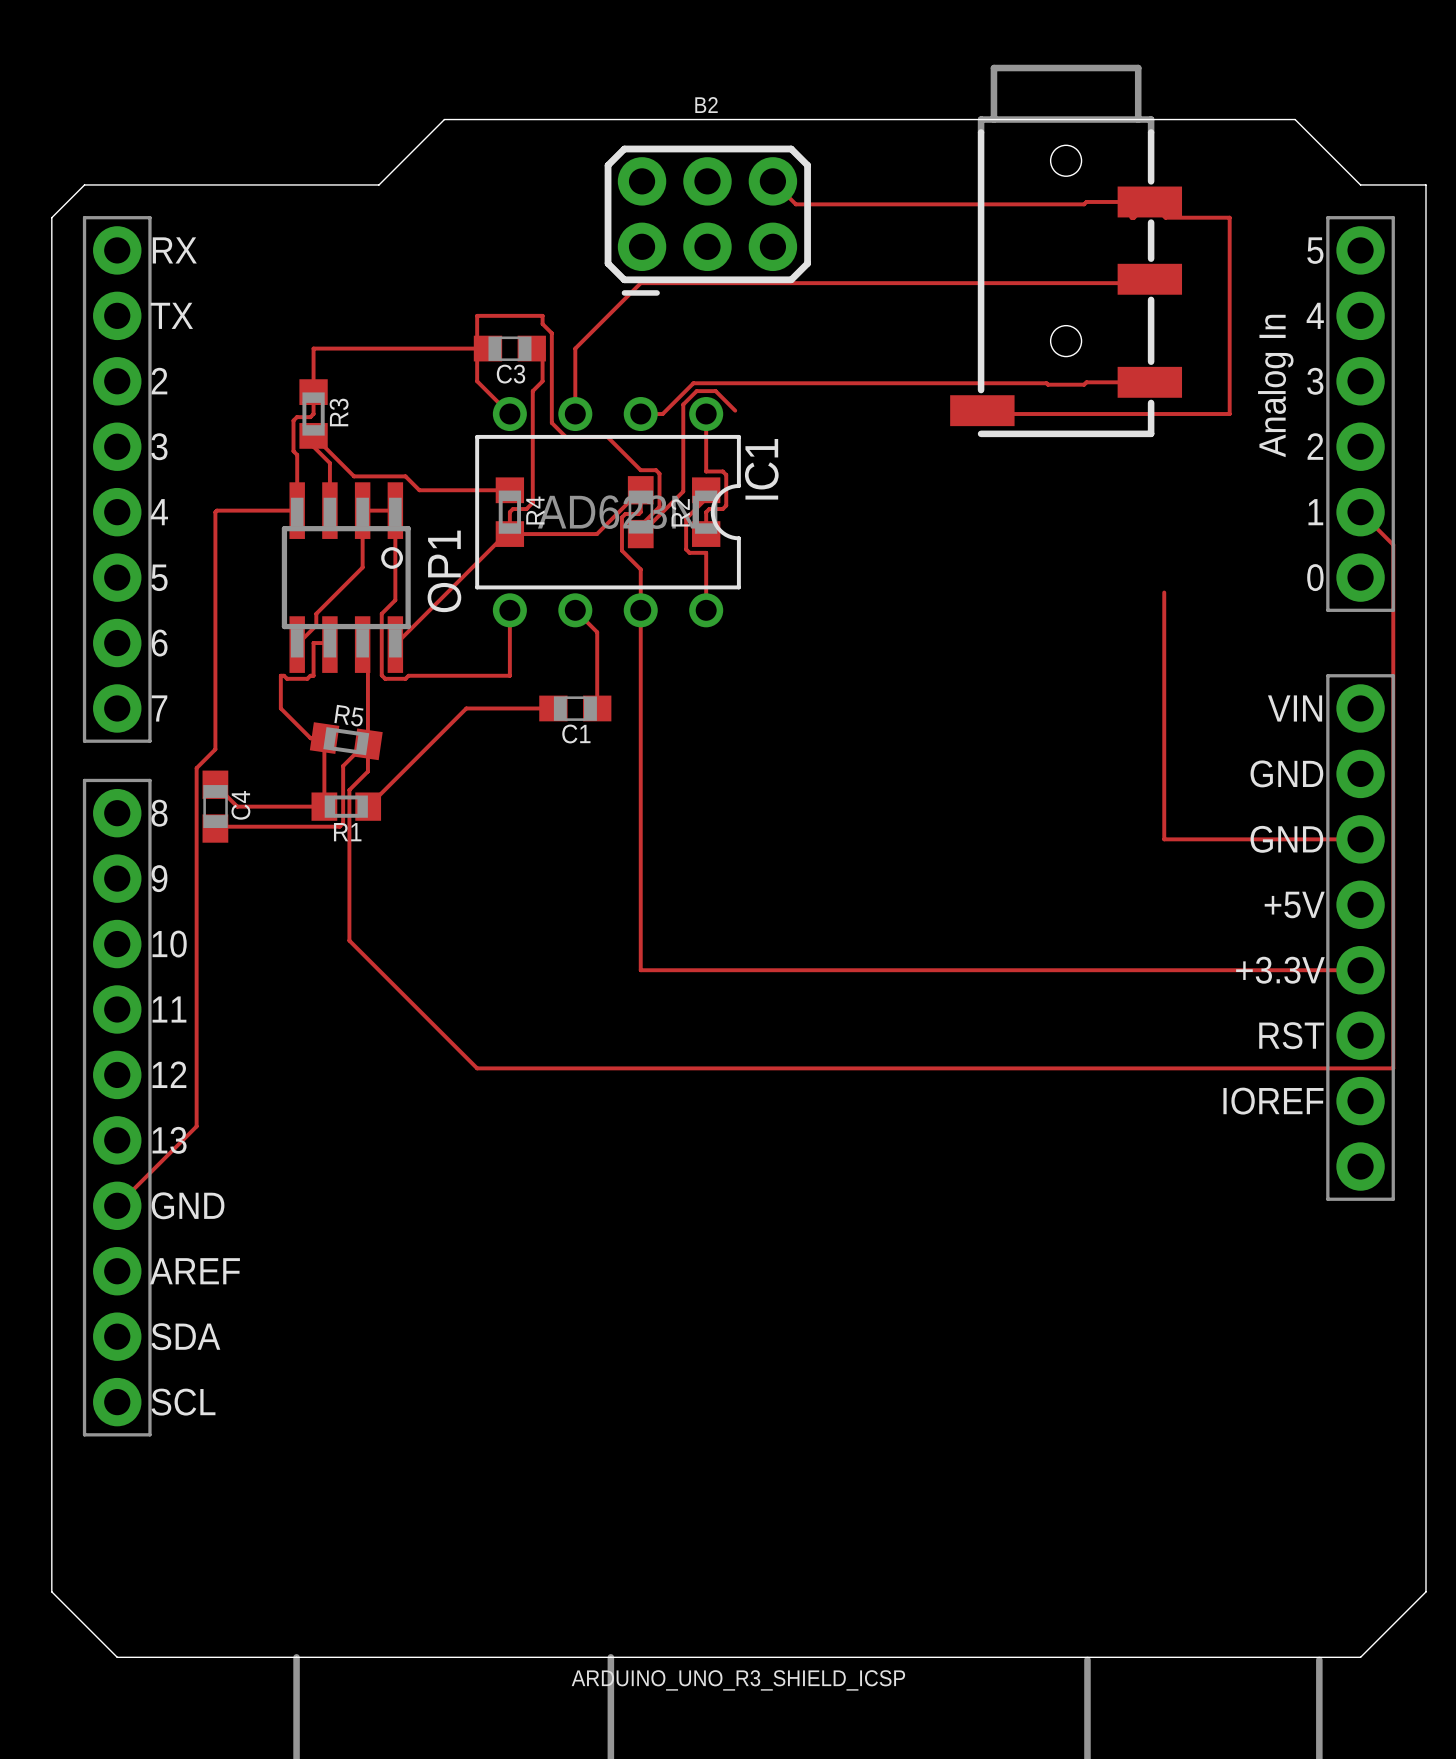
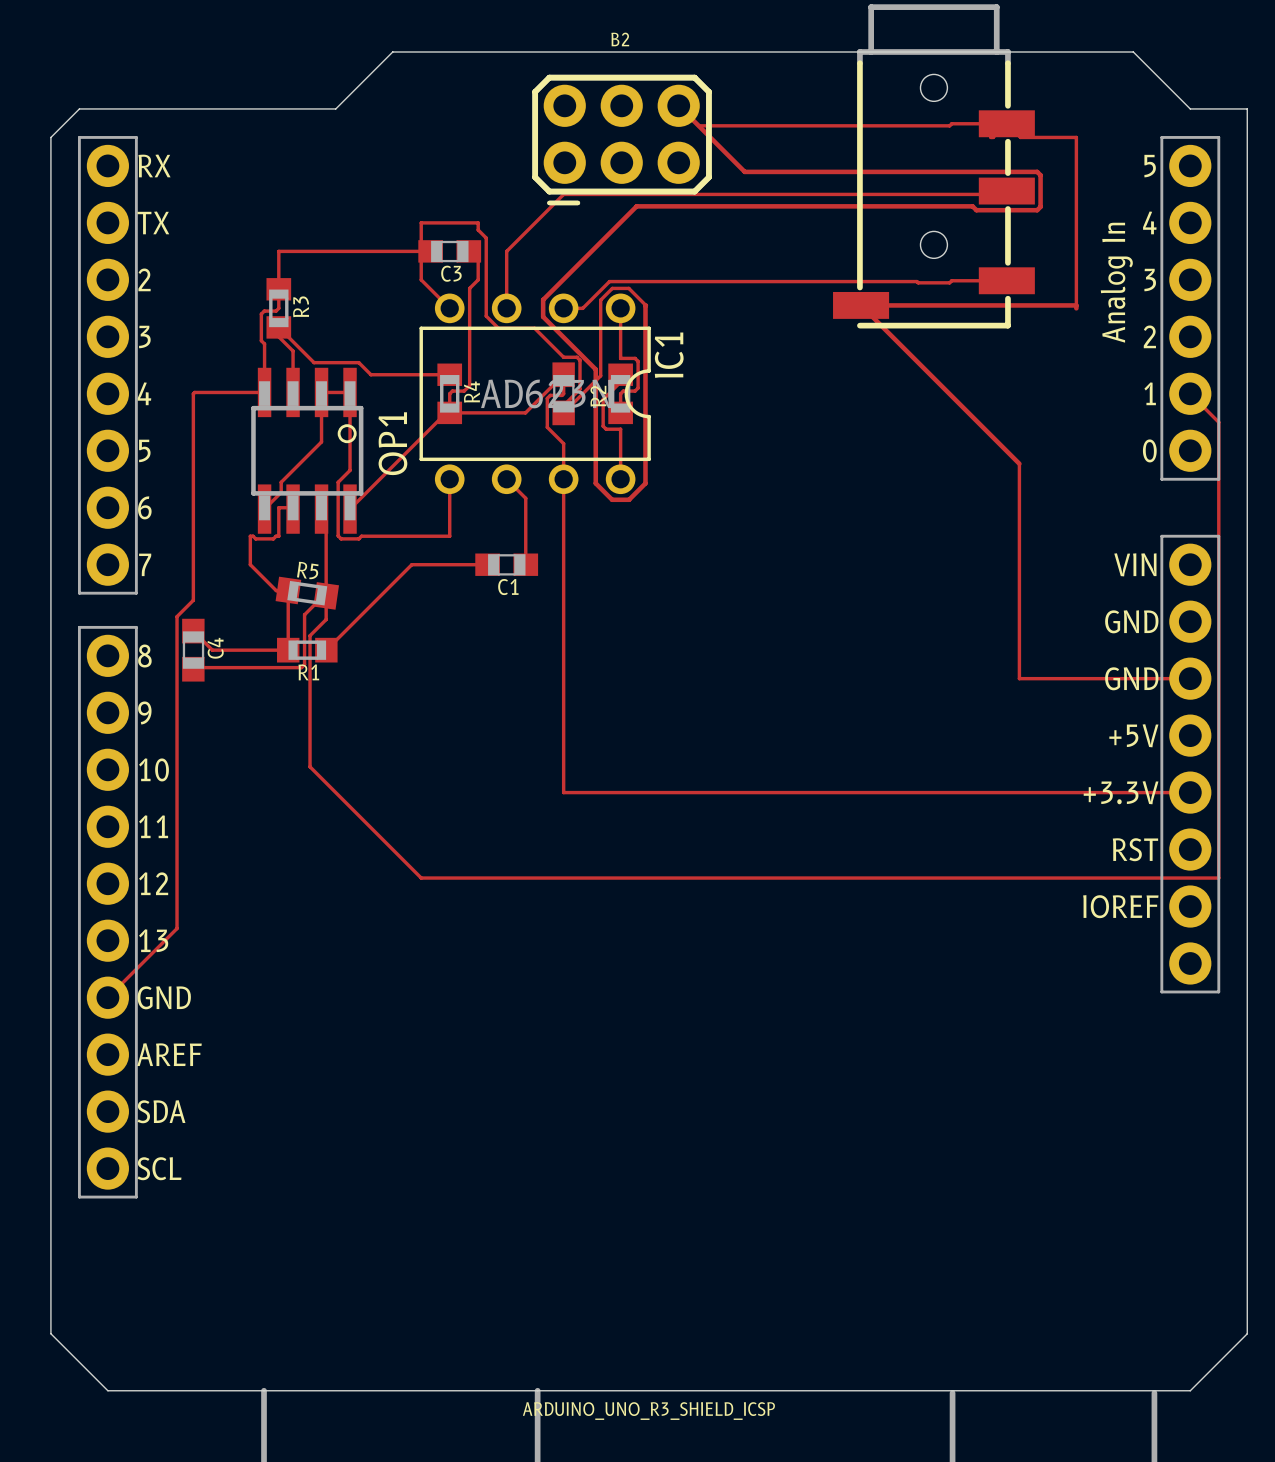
track: none -> (678, 105) (744, 171) (1037, 171) (1040, 175) (1040, 206) (1037, 210) (976, 210) (972, 206) (636, 206) (543, 299) (543, 316) (595, 369) (595, 483) (612, 499) (629, 499) (645, 483) (645, 305)
track: (985, 414) (1229, 414) -> (1019, 463) (861, 305) (1076, 305) (1076, 308)

